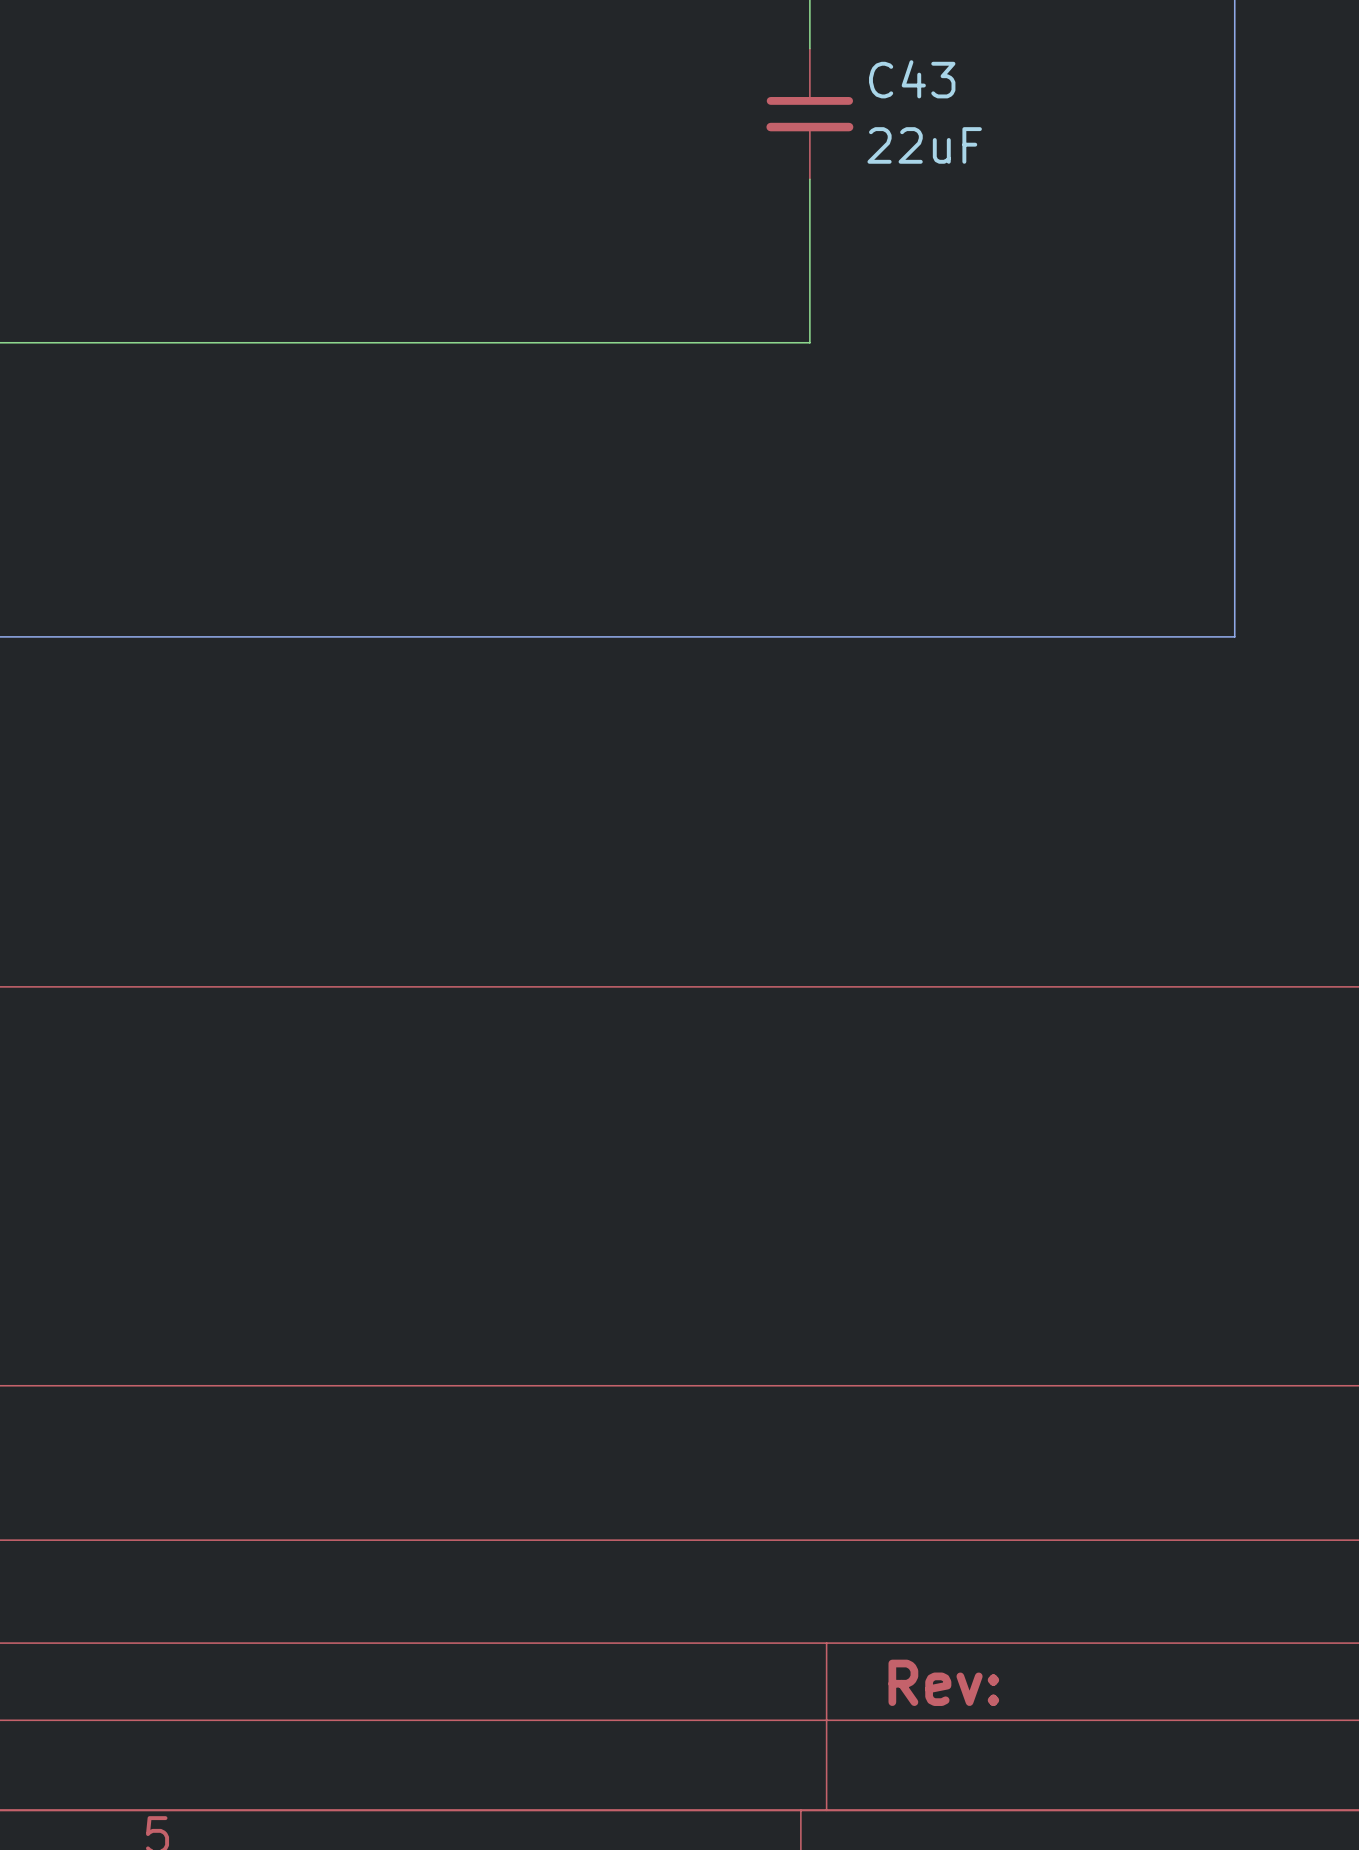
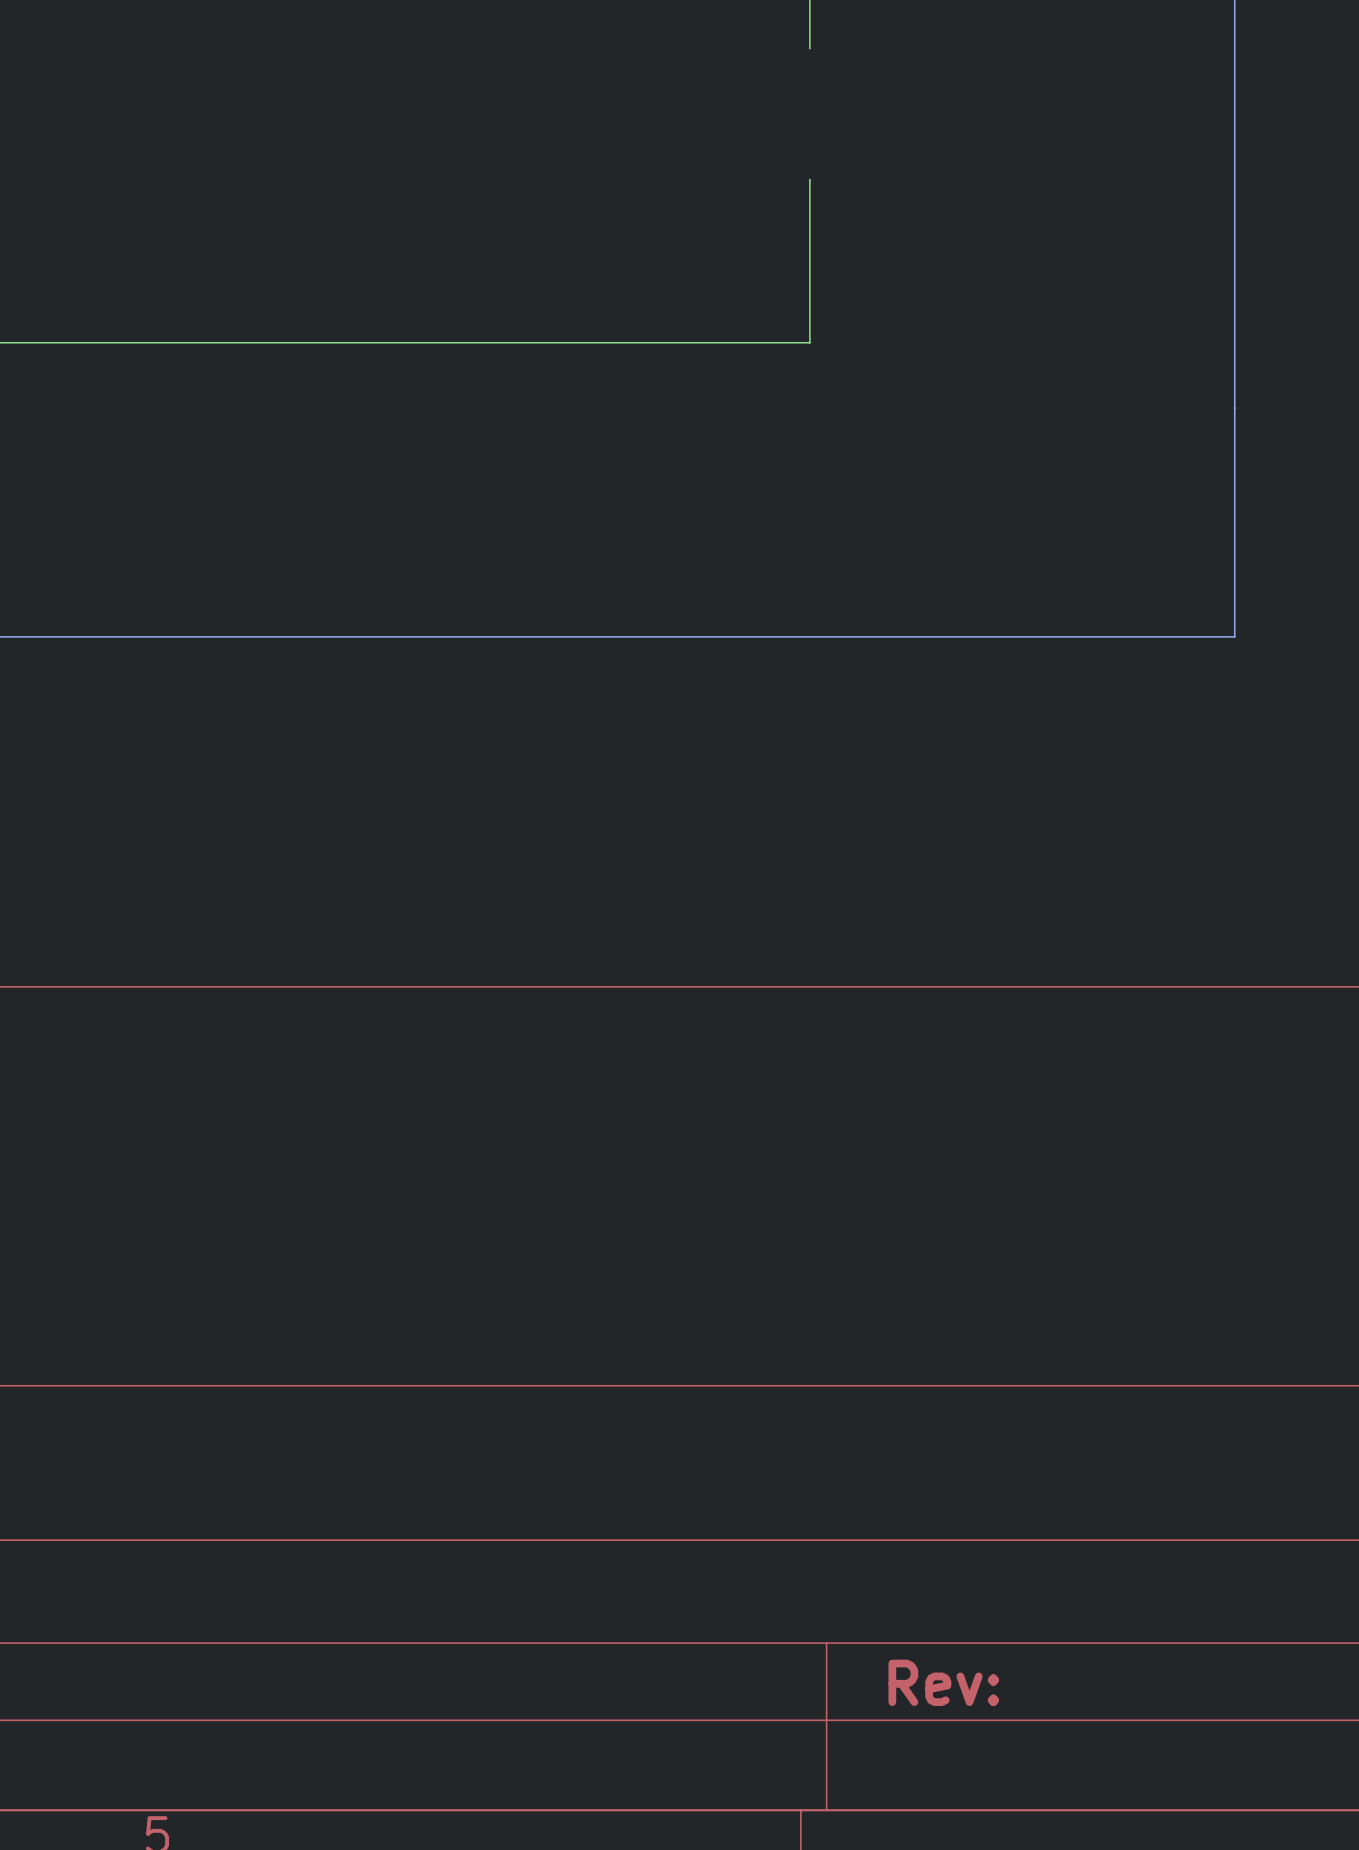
C43: 22uF (809, 113) -> none

